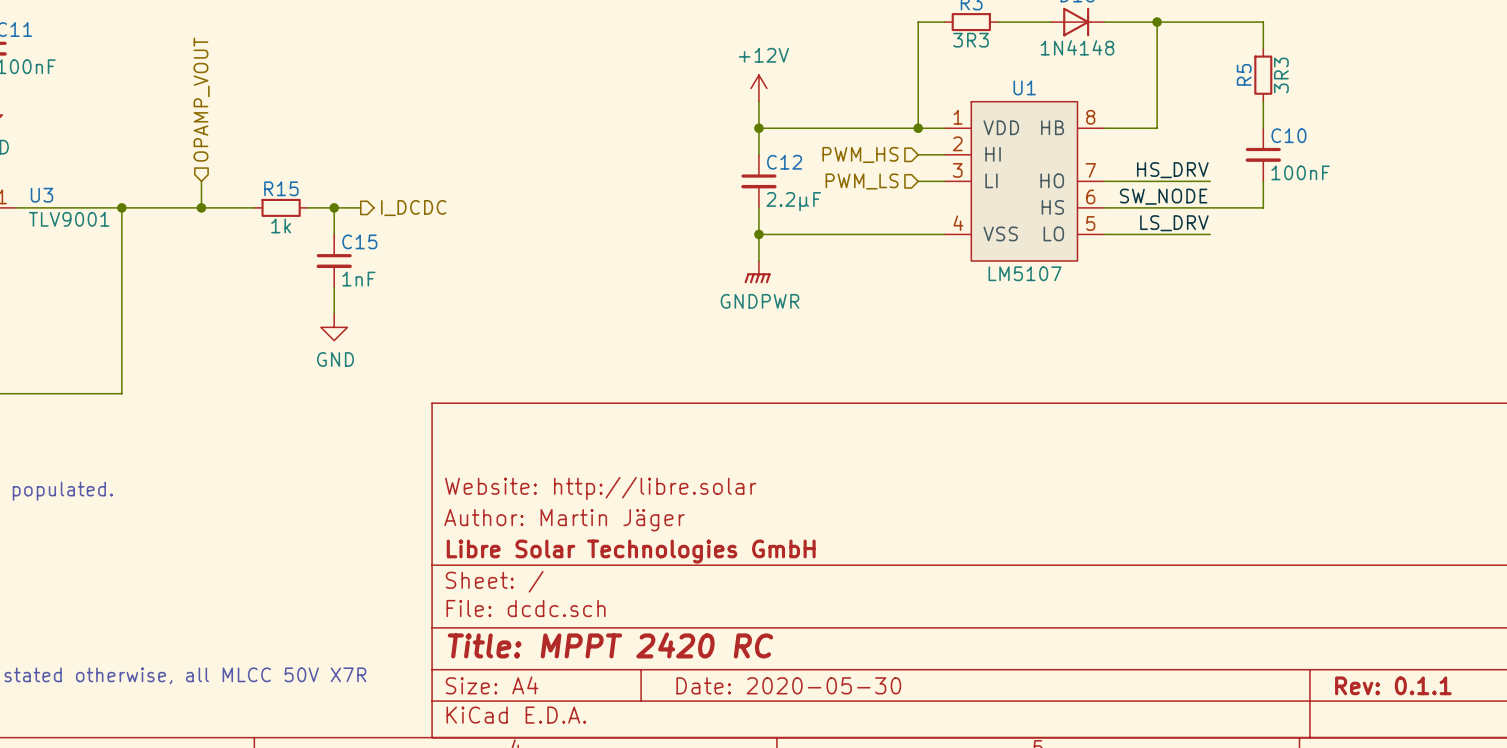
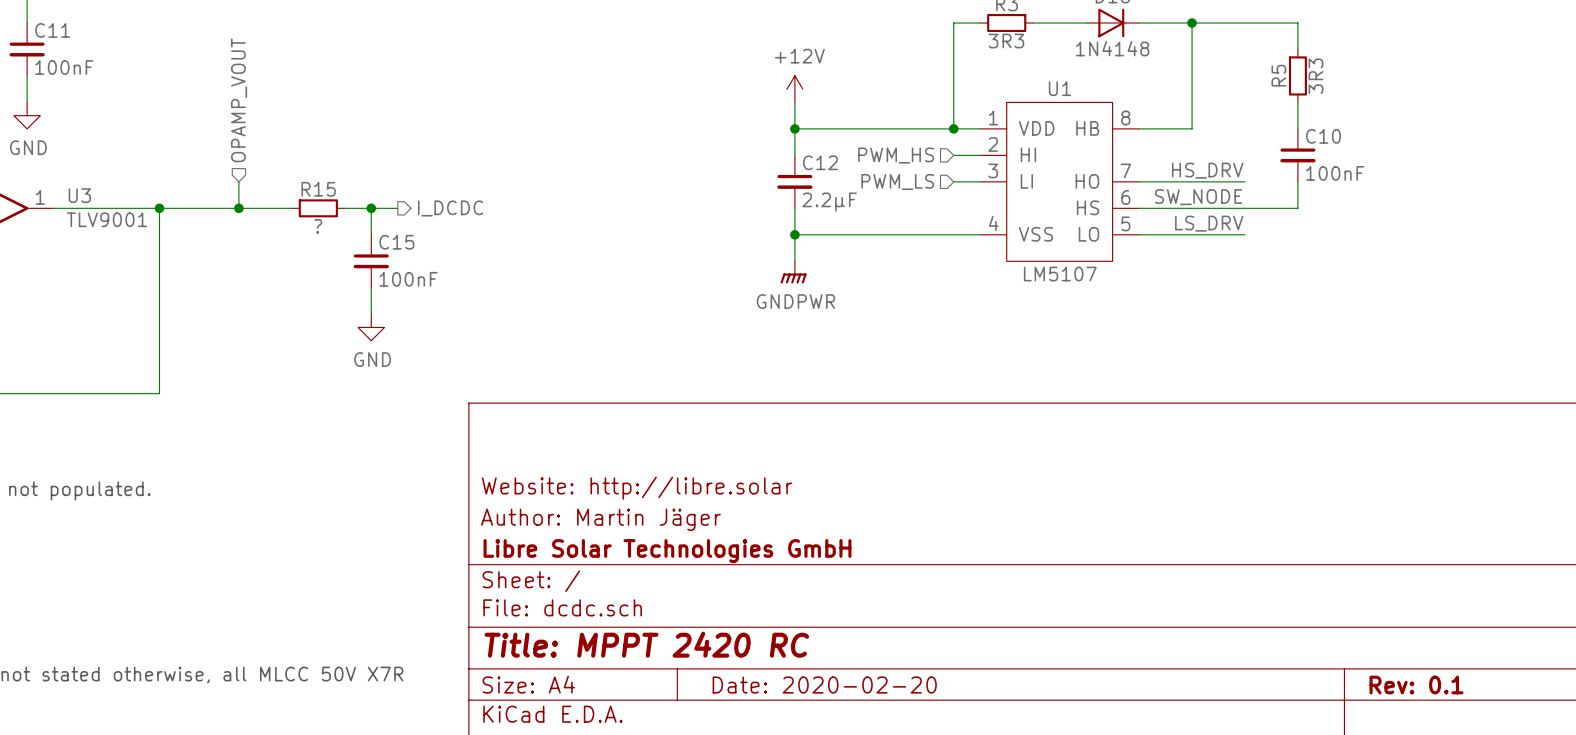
R15 value: 1k (281, 225) -> ? (318, 226)
C15 value: 1nF (358, 279) -> 100nF (408, 279)
title block: Date: 2020-05-30 (788, 685) -> Date: 2020-02-20 (824, 685)
title block: Rev: 0.1.1 (1393, 685) -> Rev: 0.1 (1416, 685)

